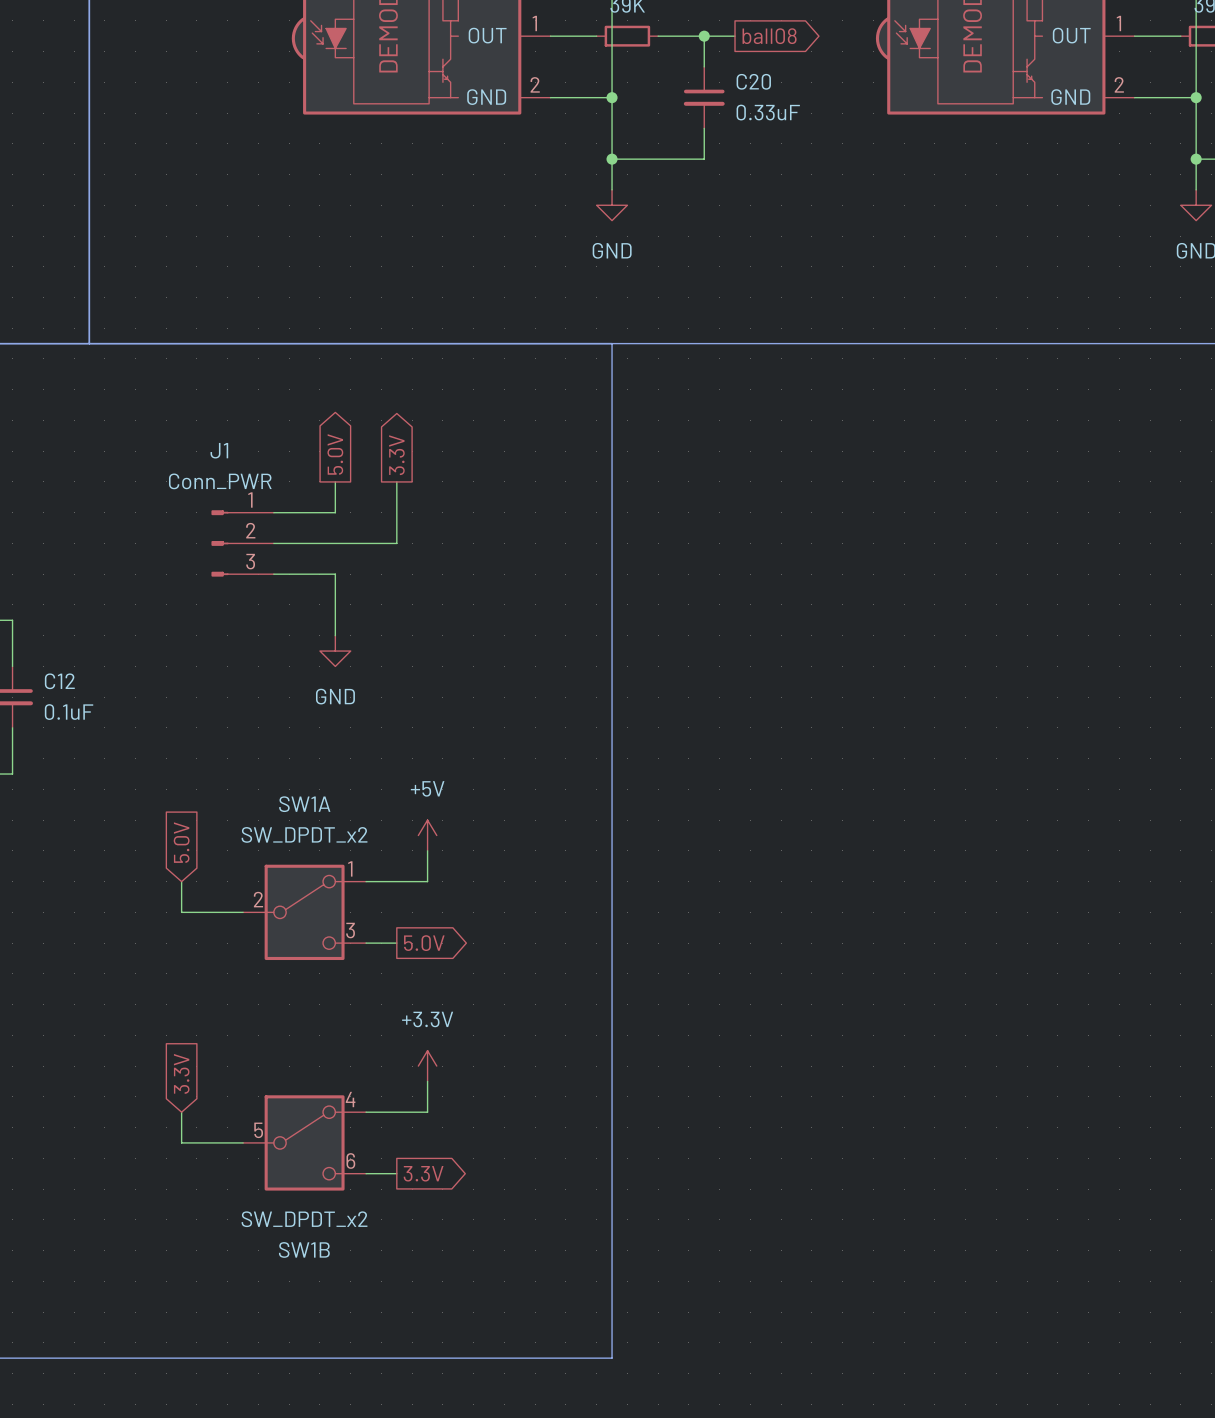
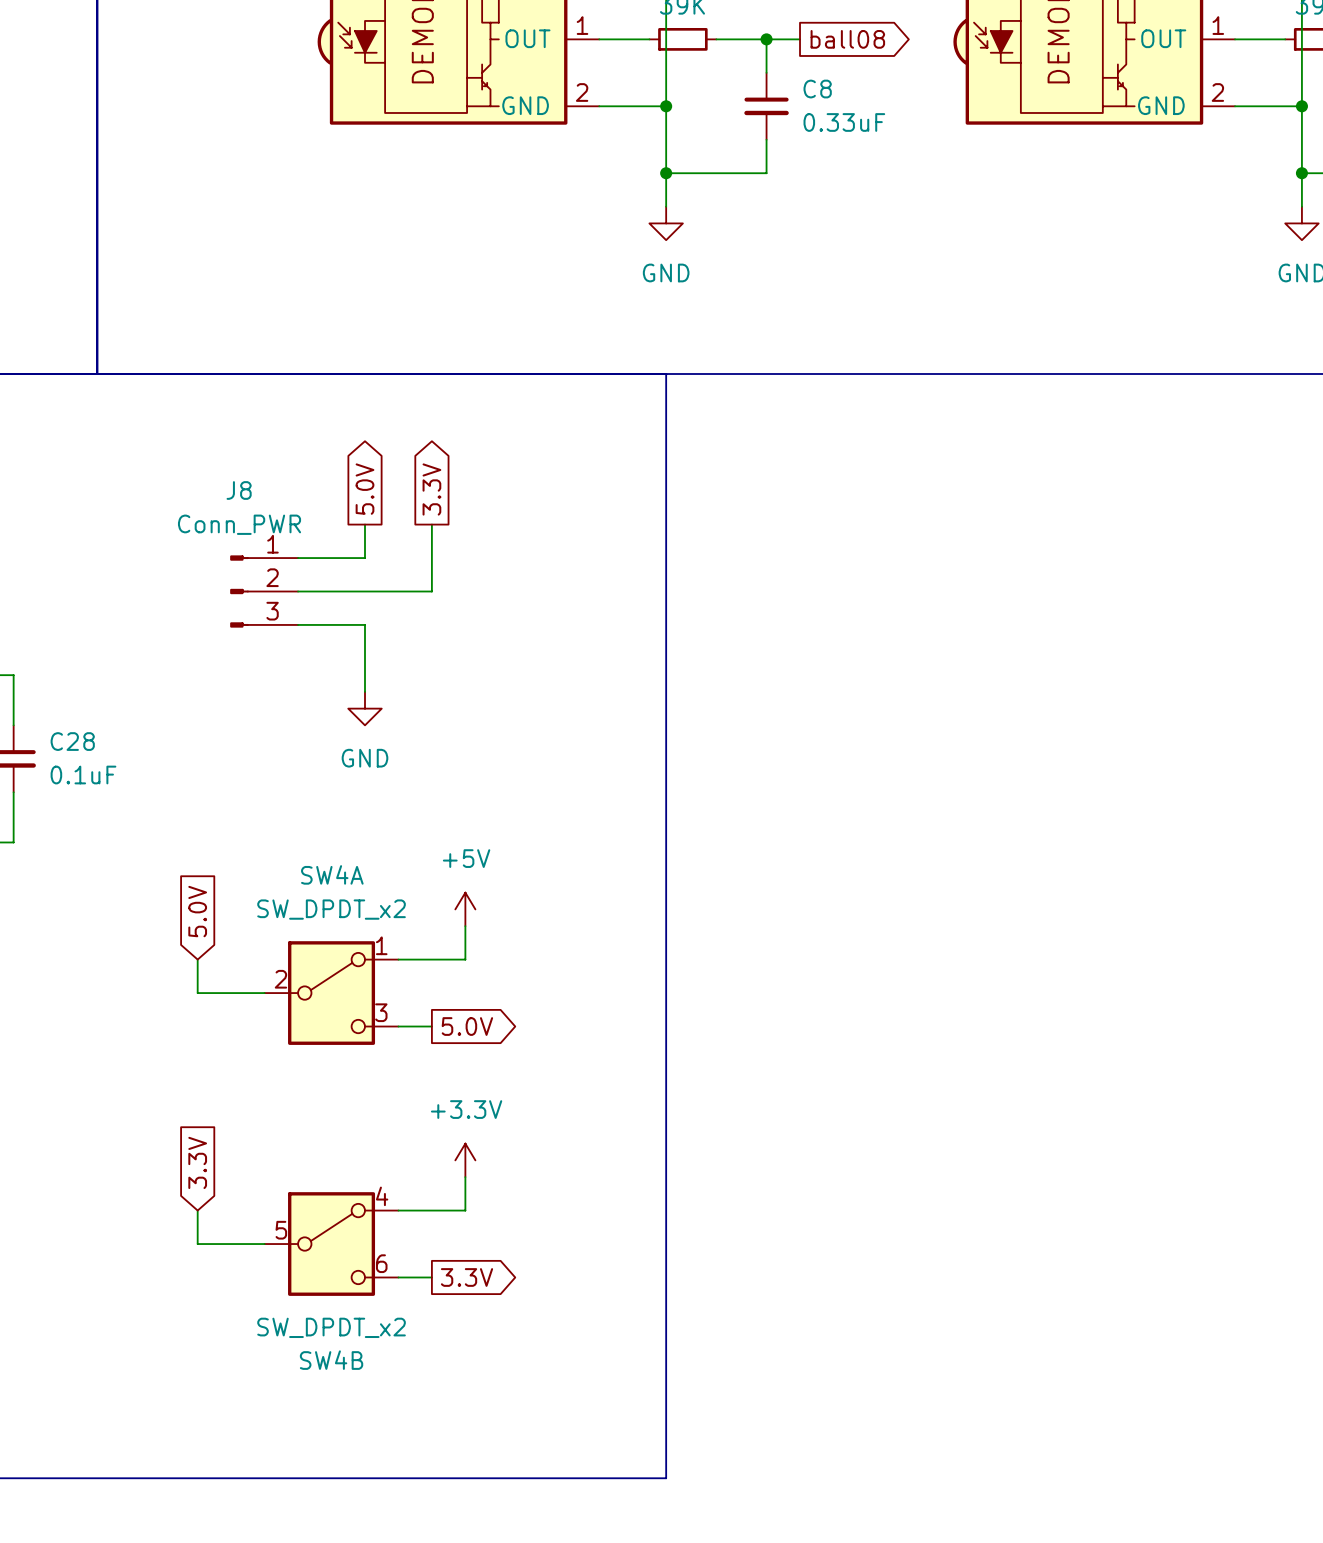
C20 name: C20 (753, 81) -> C8 (817, 89)
J1 name: J1 (219, 450) -> J8 (239, 490)
C12 name: C12 (59, 681) -> C28 (72, 741)
SW1A name: SW1A (304, 804) -> SW4A (332, 874)
SW1B name: SW1B (304, 1249) -> SW4B (331, 1360)

